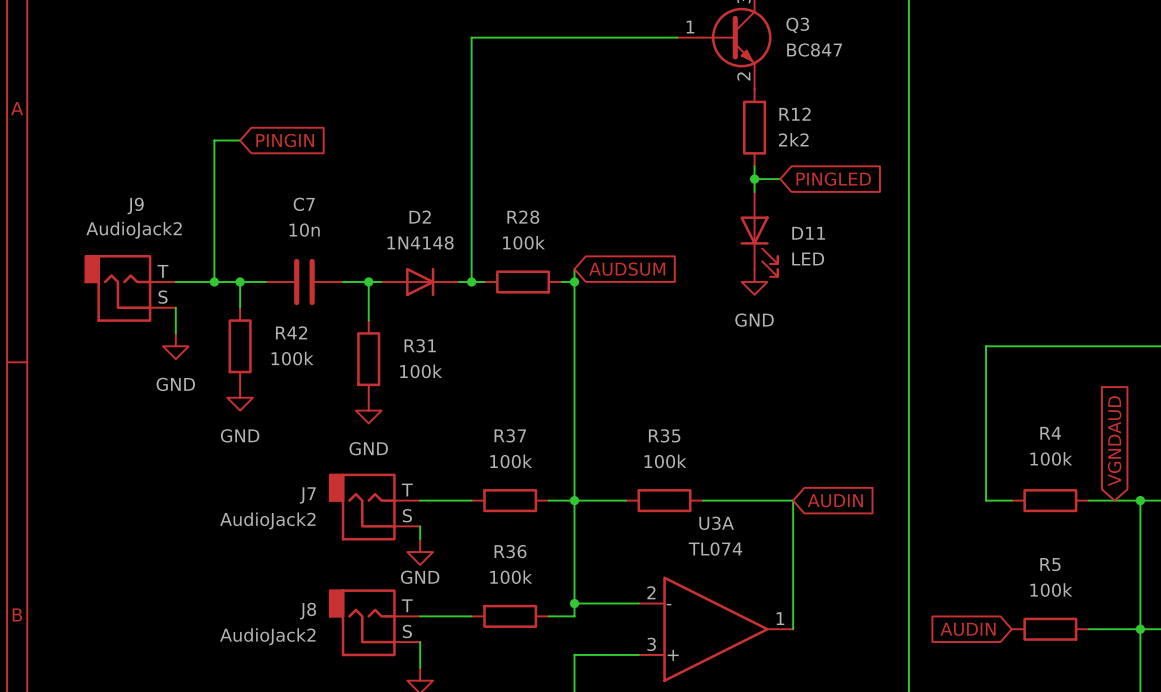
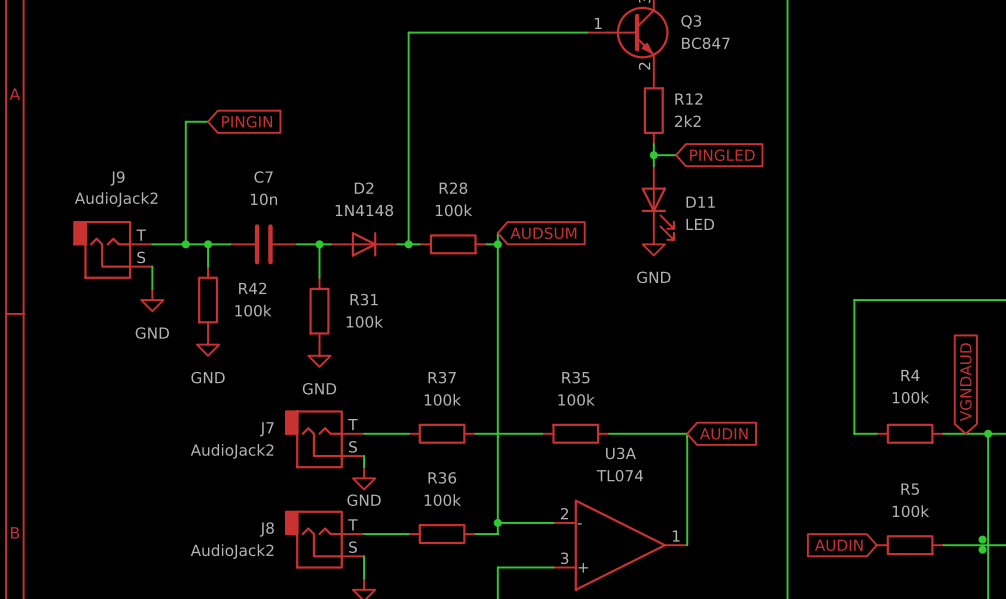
junction: (574, 500) -> none
junction: none -> (982, 539)
junction: (1140, 629) -> none
junction: none -> (982, 549)

